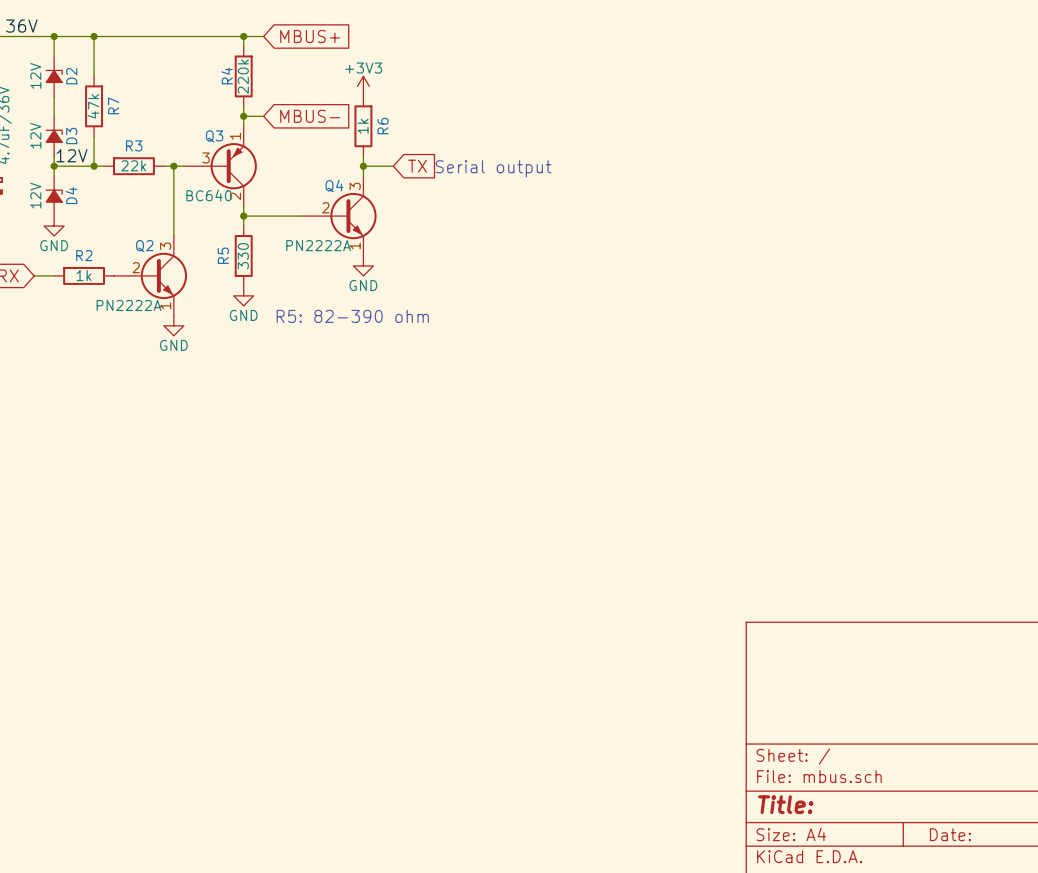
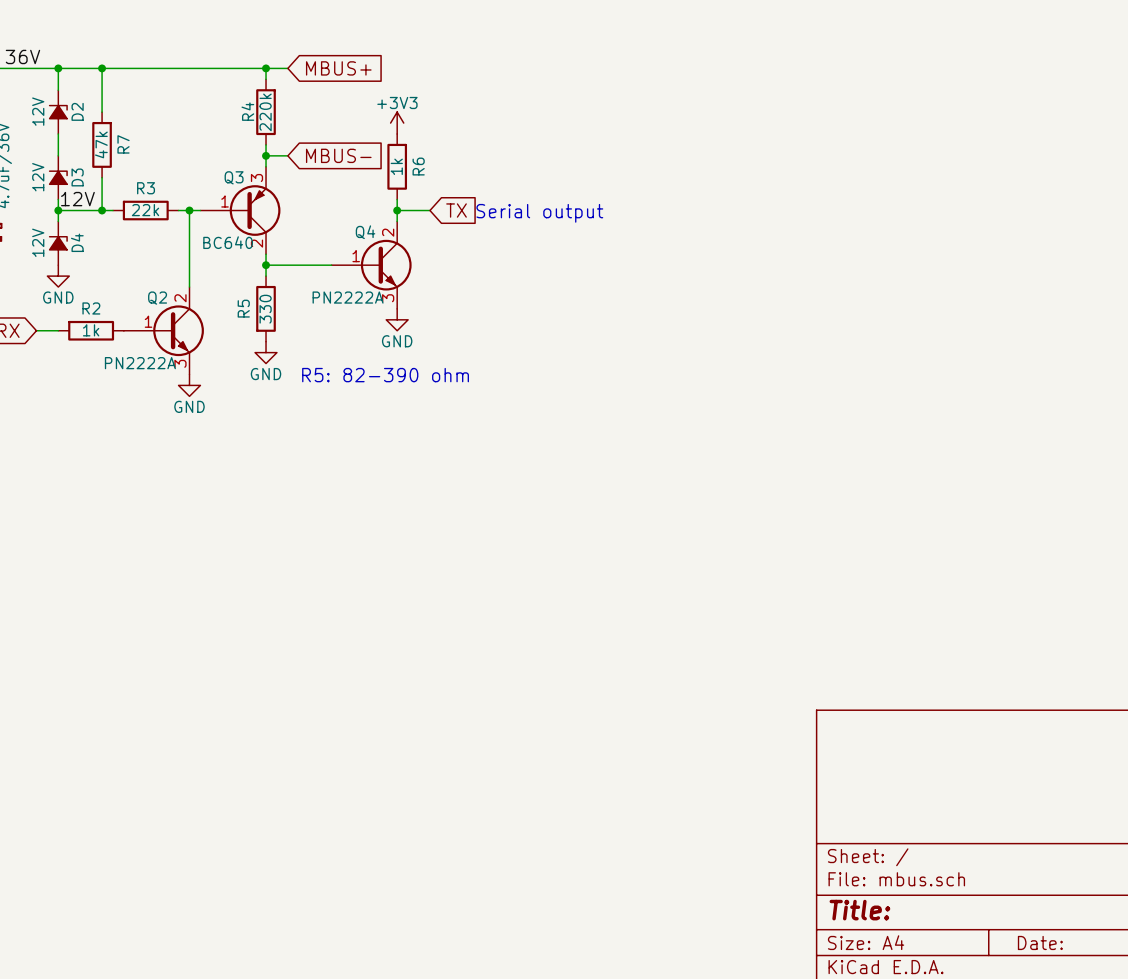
Q3 pin number: 1 (235, 136) -> 3 (256, 177)
Q3 pin number: 3 (206, 157) -> 1 (225, 201)
Q4 pin number: 3 (355, 186) -> 2 (388, 232)
Q4 pin number: 2 (325, 207) -> 1 (356, 256)
Q2 pin number: 3 (165, 246) -> 2 (180, 298)
Q4 pin number: 1 (355, 246) -> 3 (388, 298)
Q2 pin number: 2 (136, 267) -> 1 (148, 321)
Q2 pin number: 1 (165, 305) -> 3 (180, 363)

